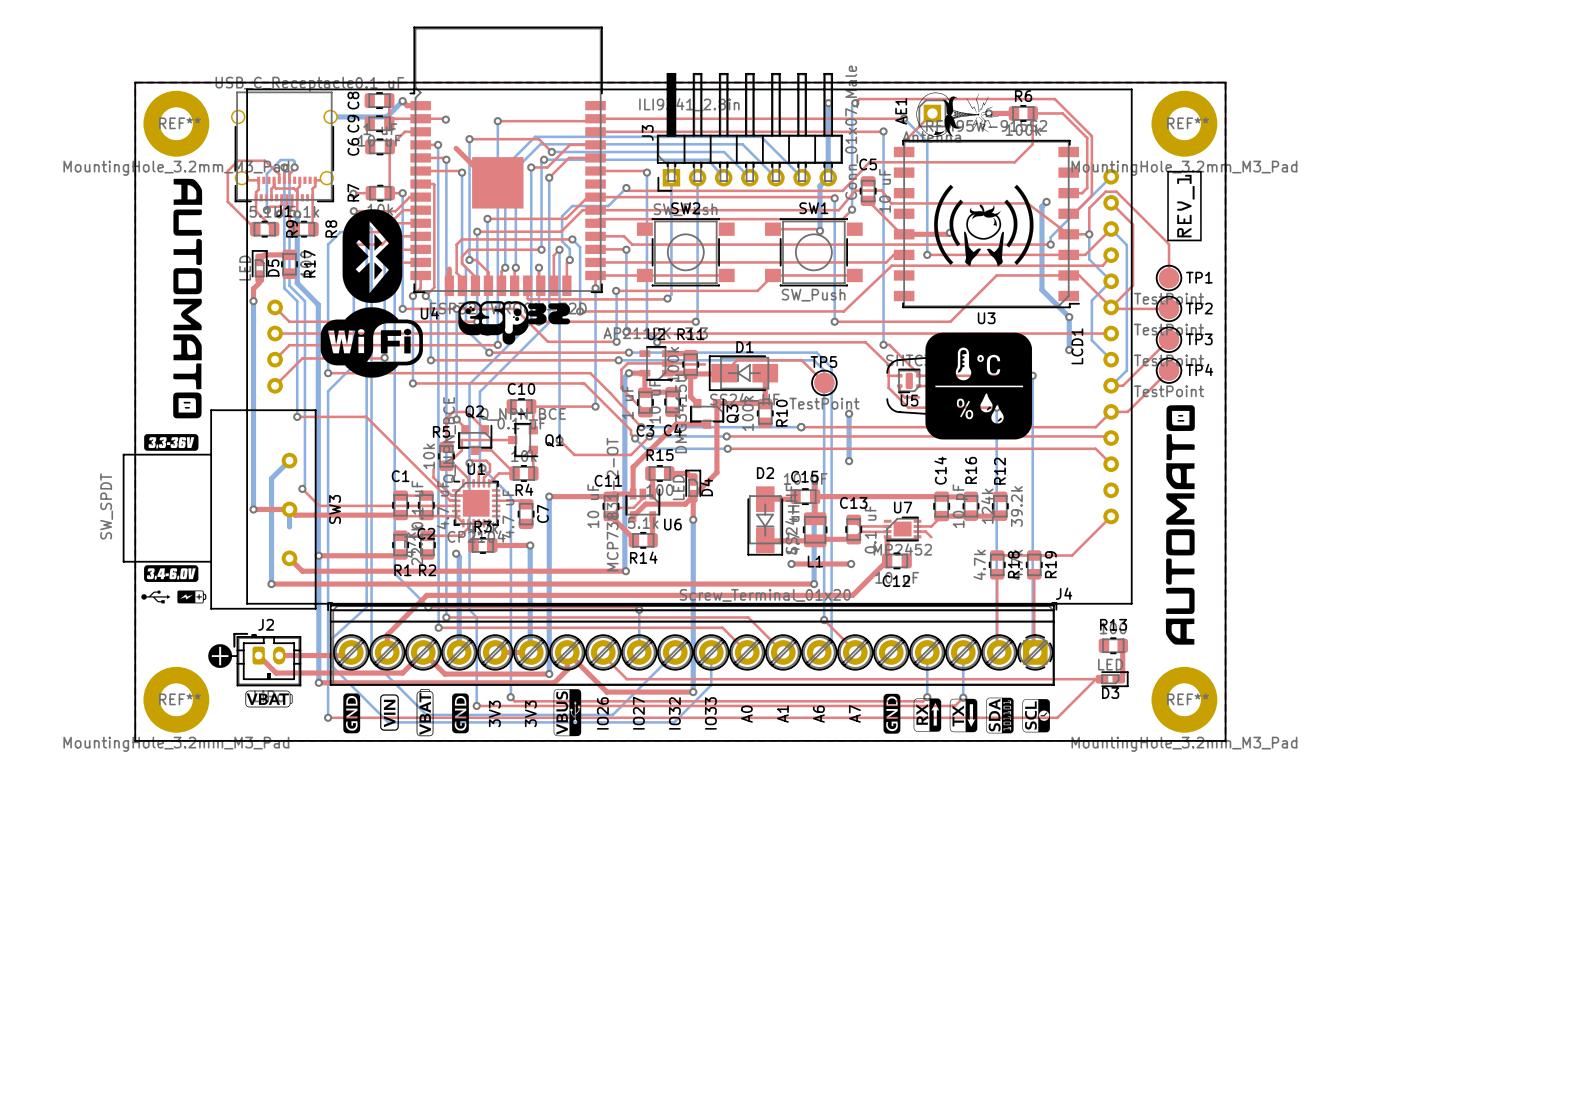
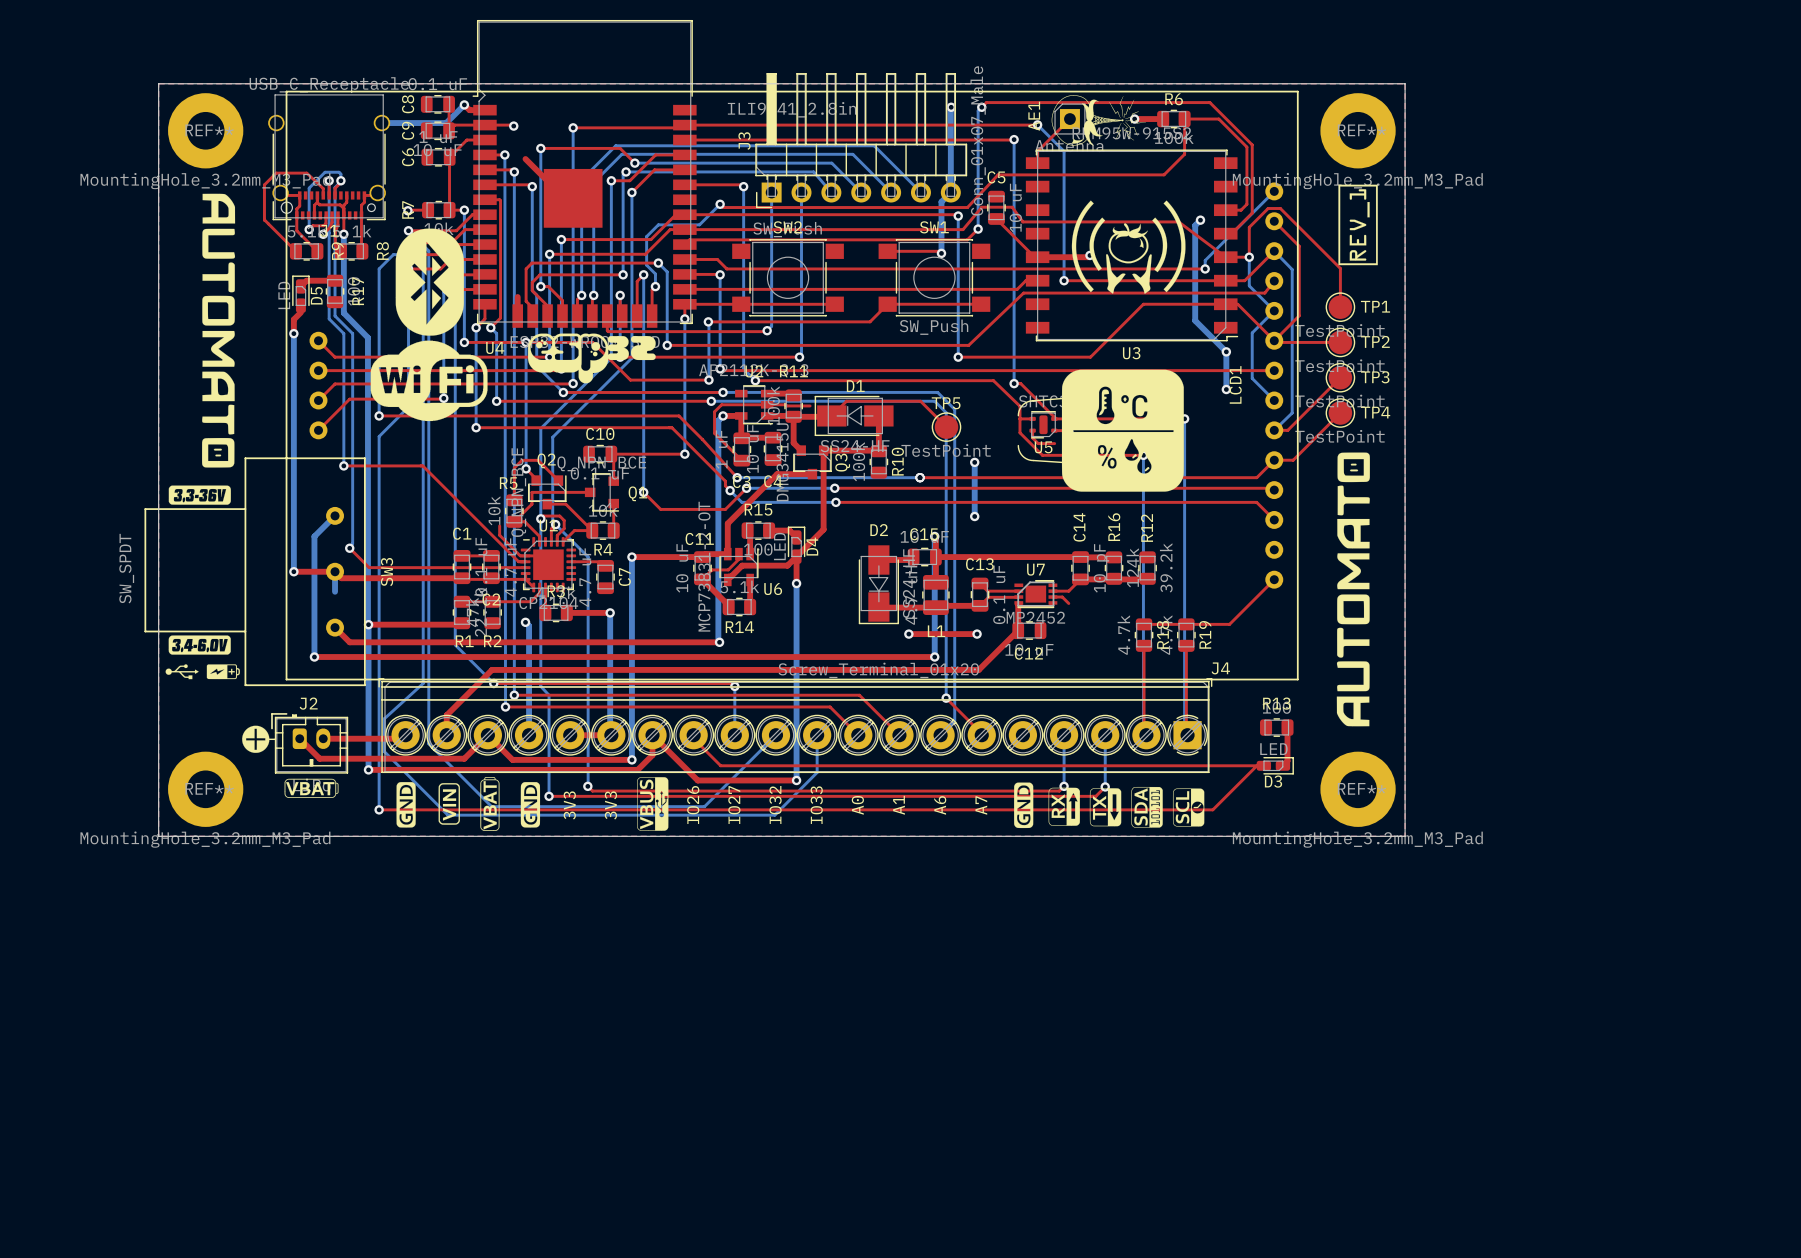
J1 footprint: [230, 91, 338, 203] -> [268, 94, 391, 221]

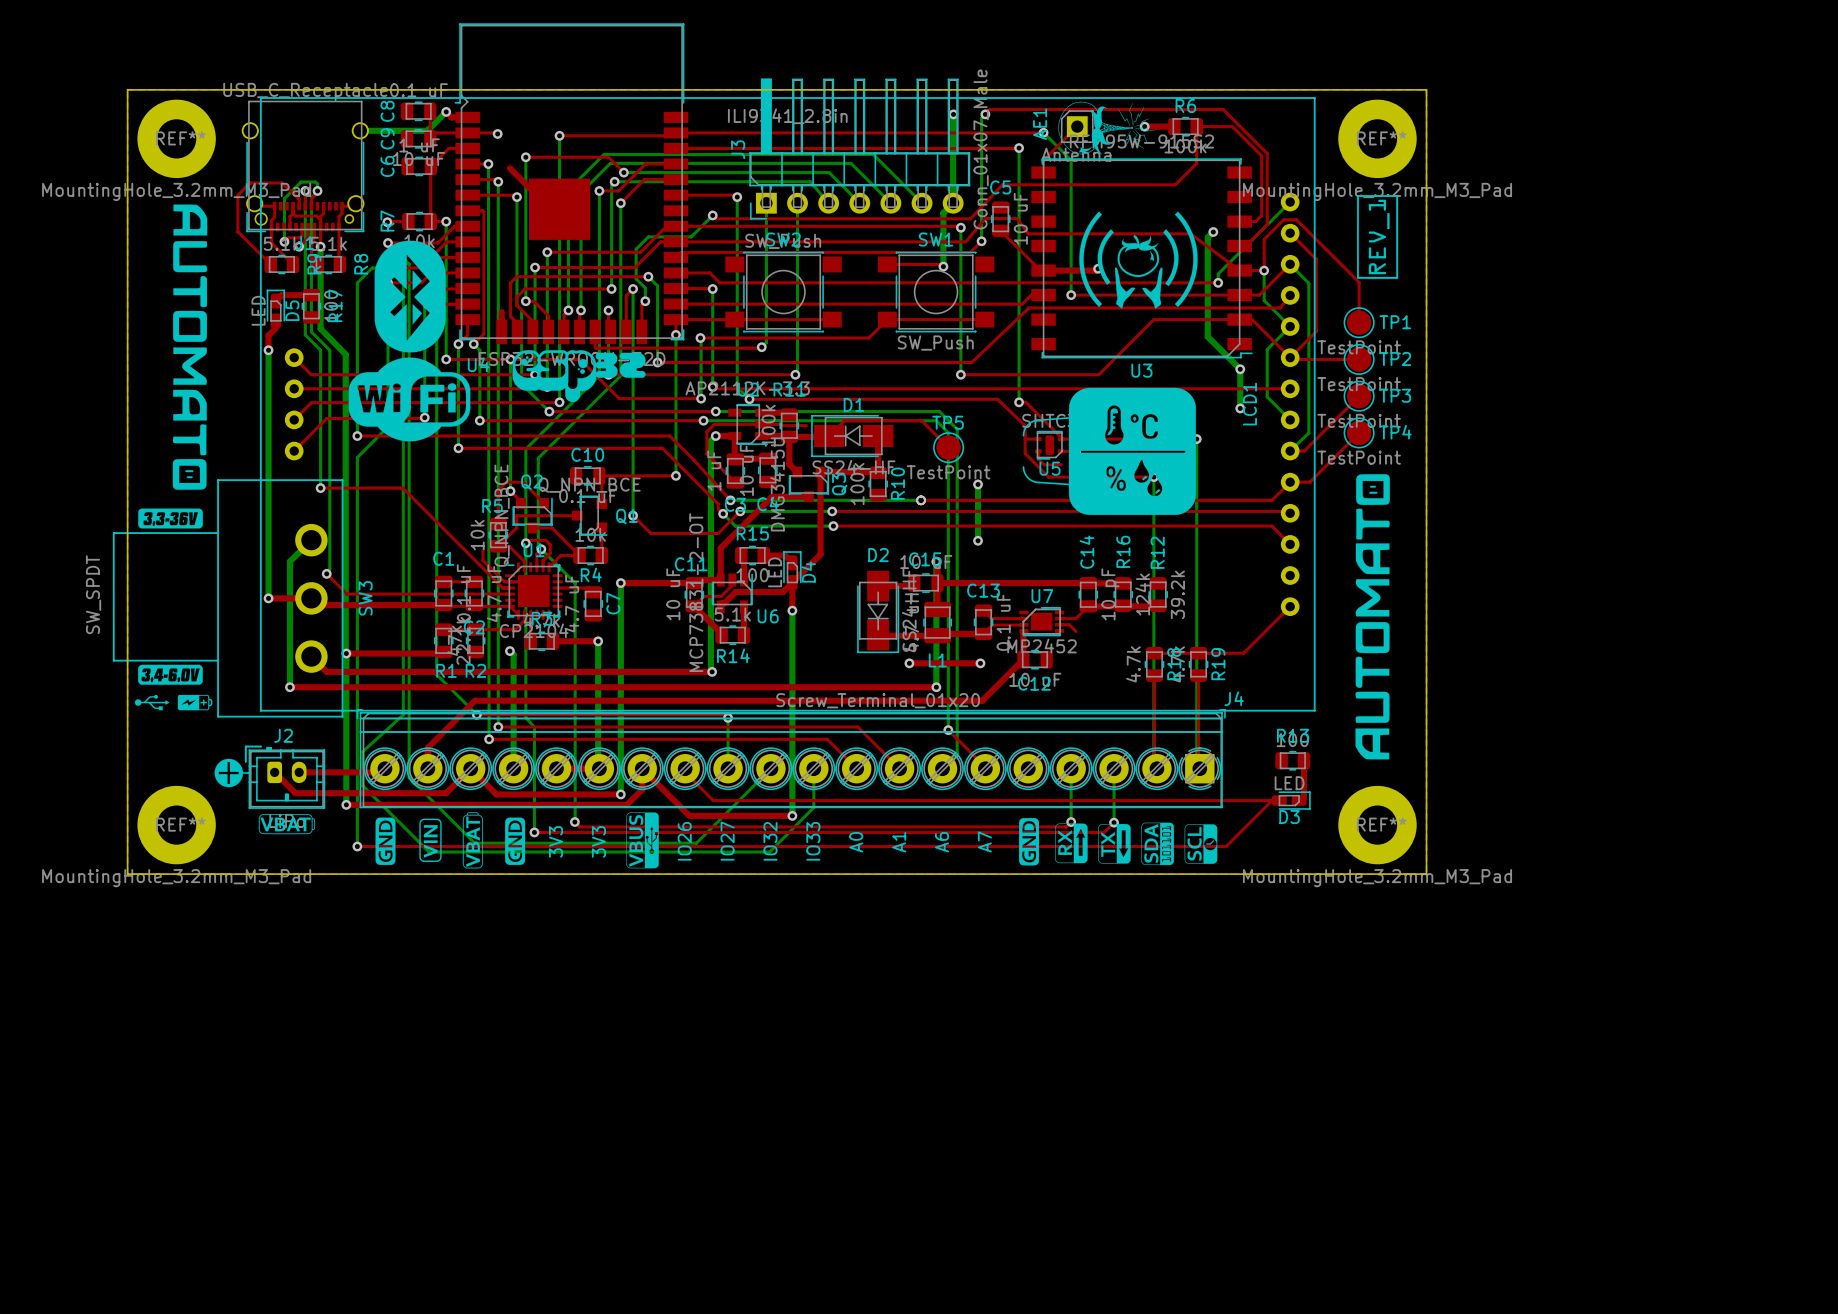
SW3 footprint: [144, 457, 366, 687] -> [112, 479, 344, 718]
bottom track: (335, 577) (335, 591) -> none

